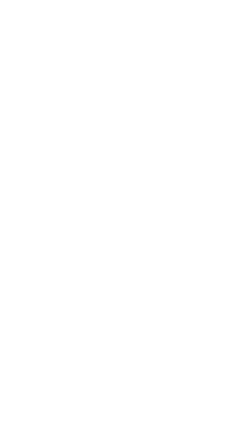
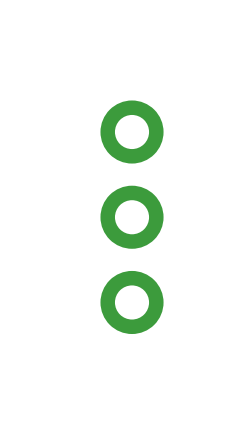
part: none -> (132, 217)

